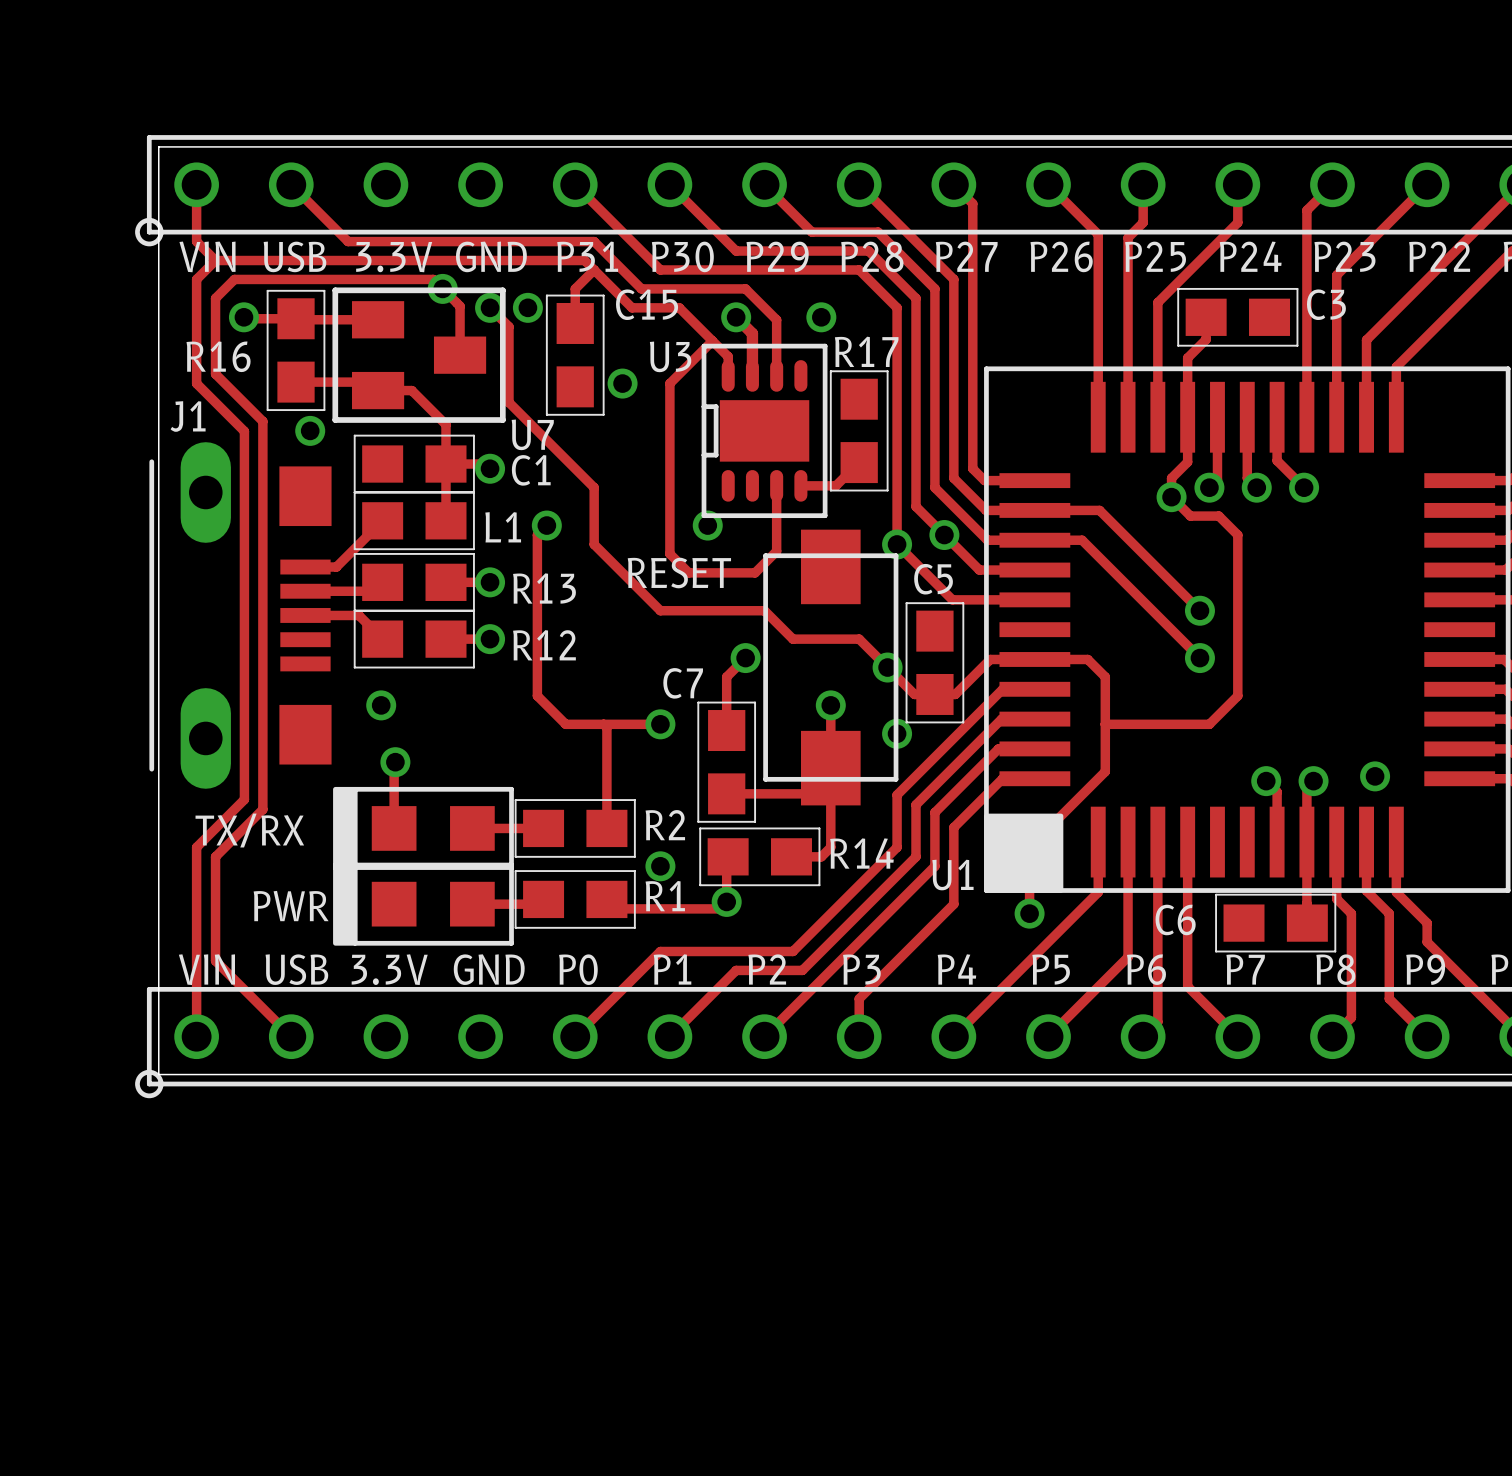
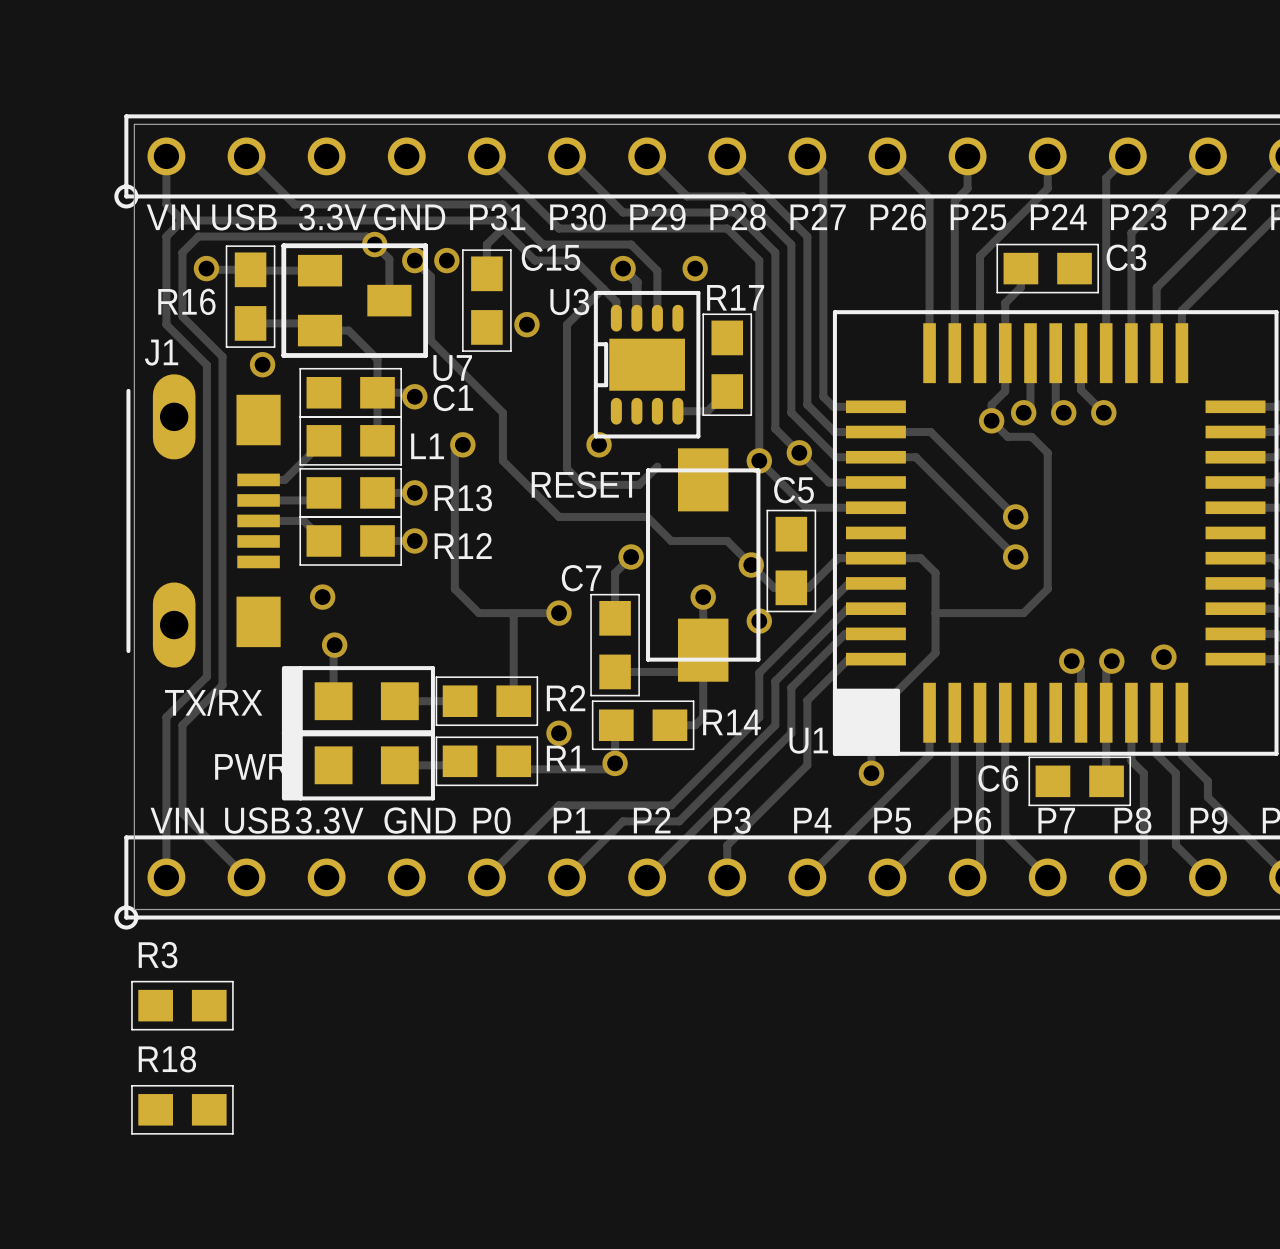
track: (776, 485) (776, 551) -> none
R3: none -> (182, 1005)
R18: none -> (182, 1109)

